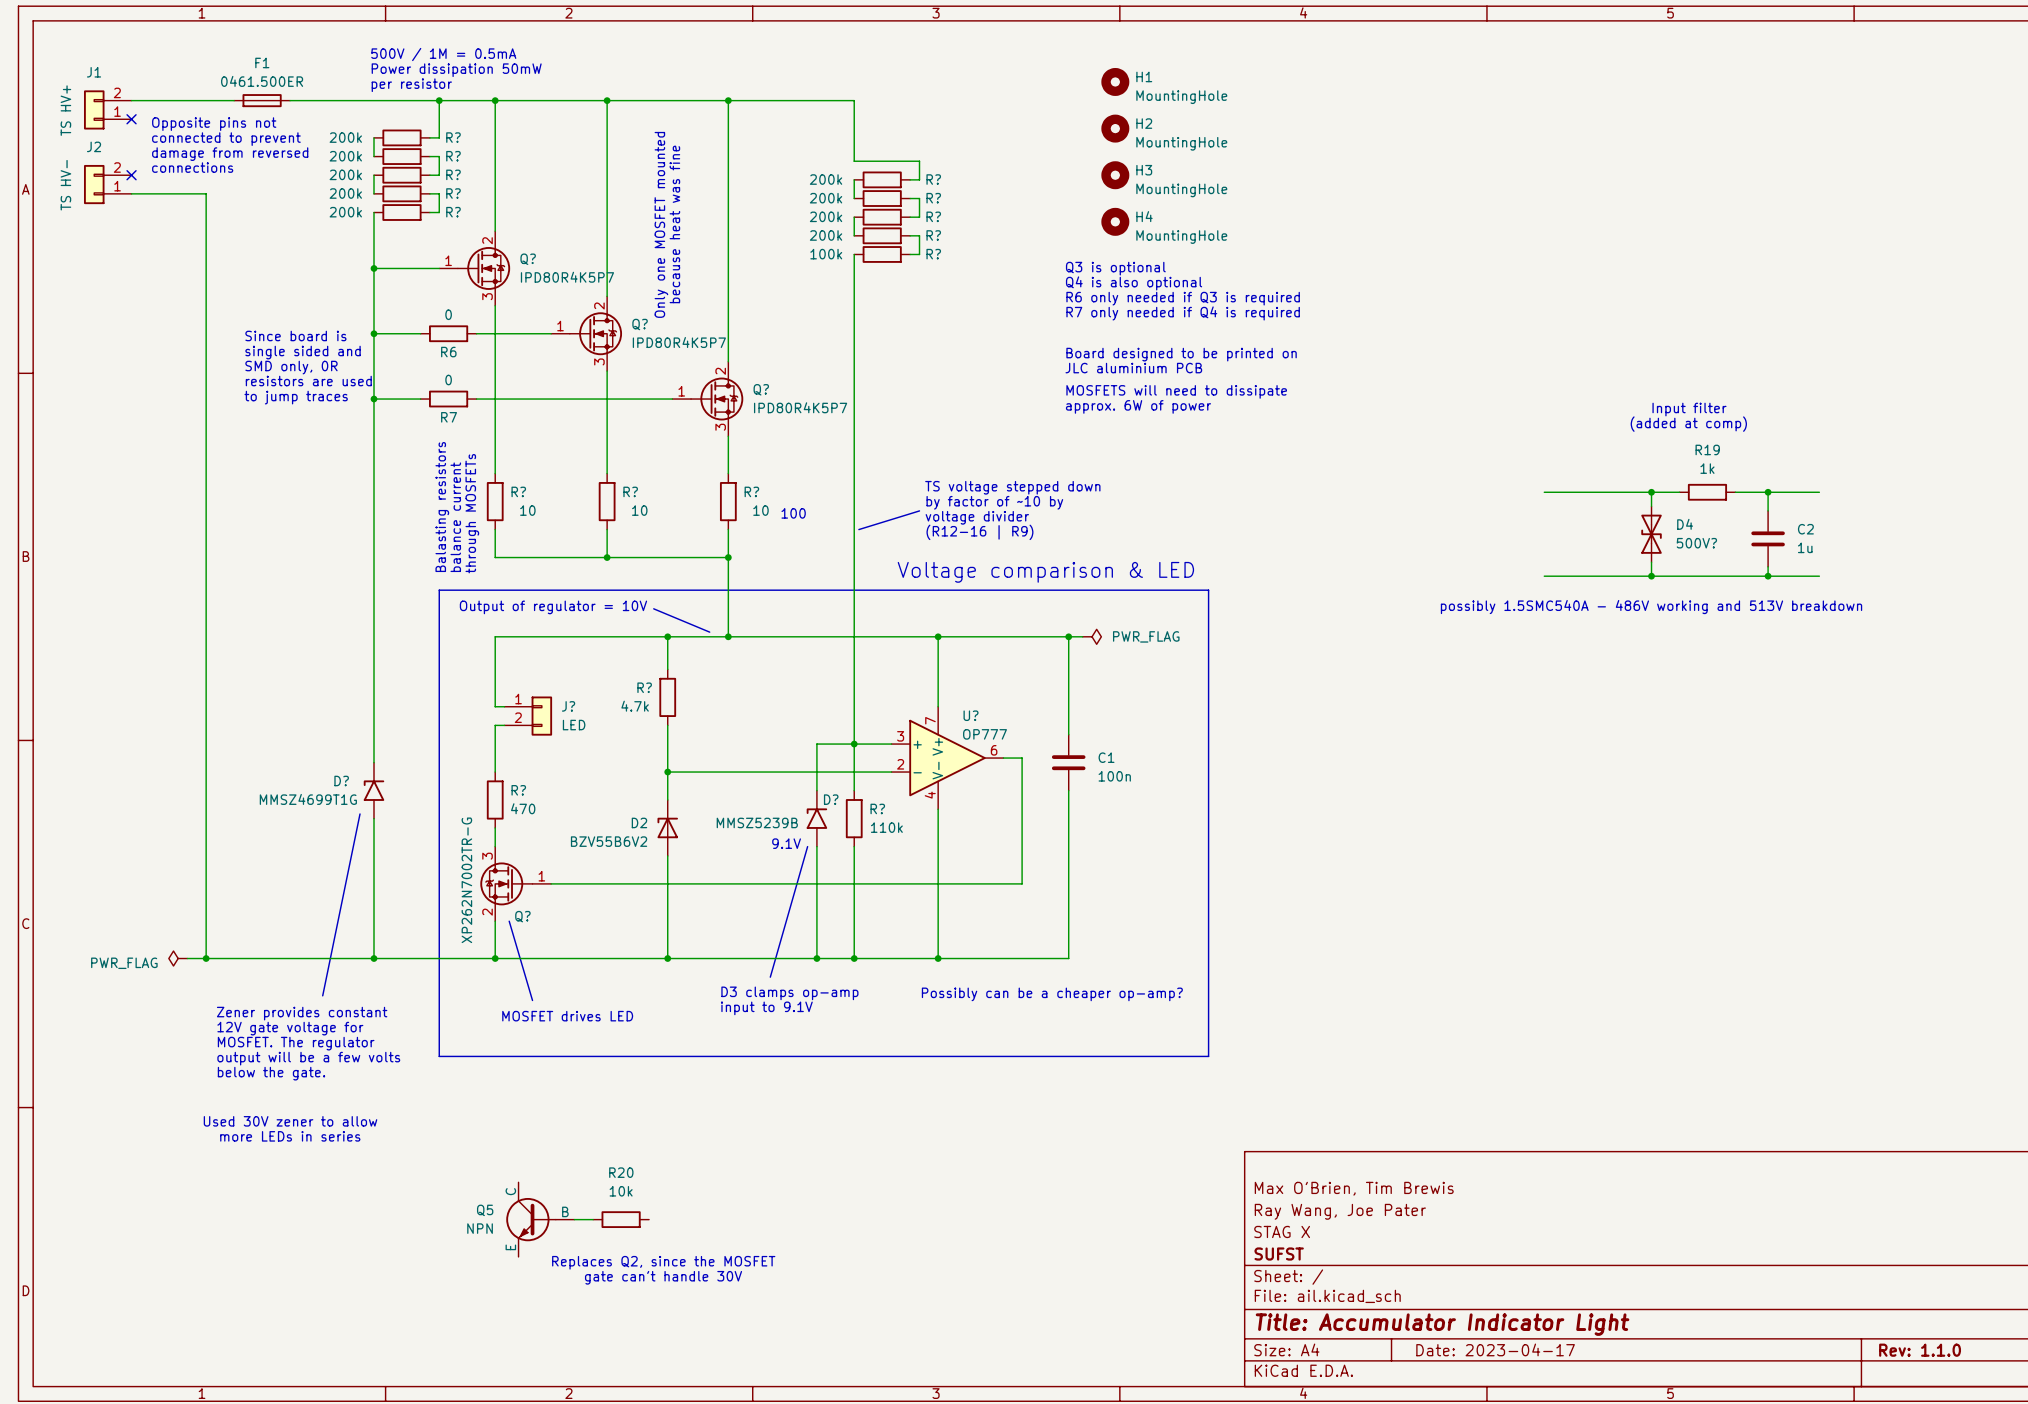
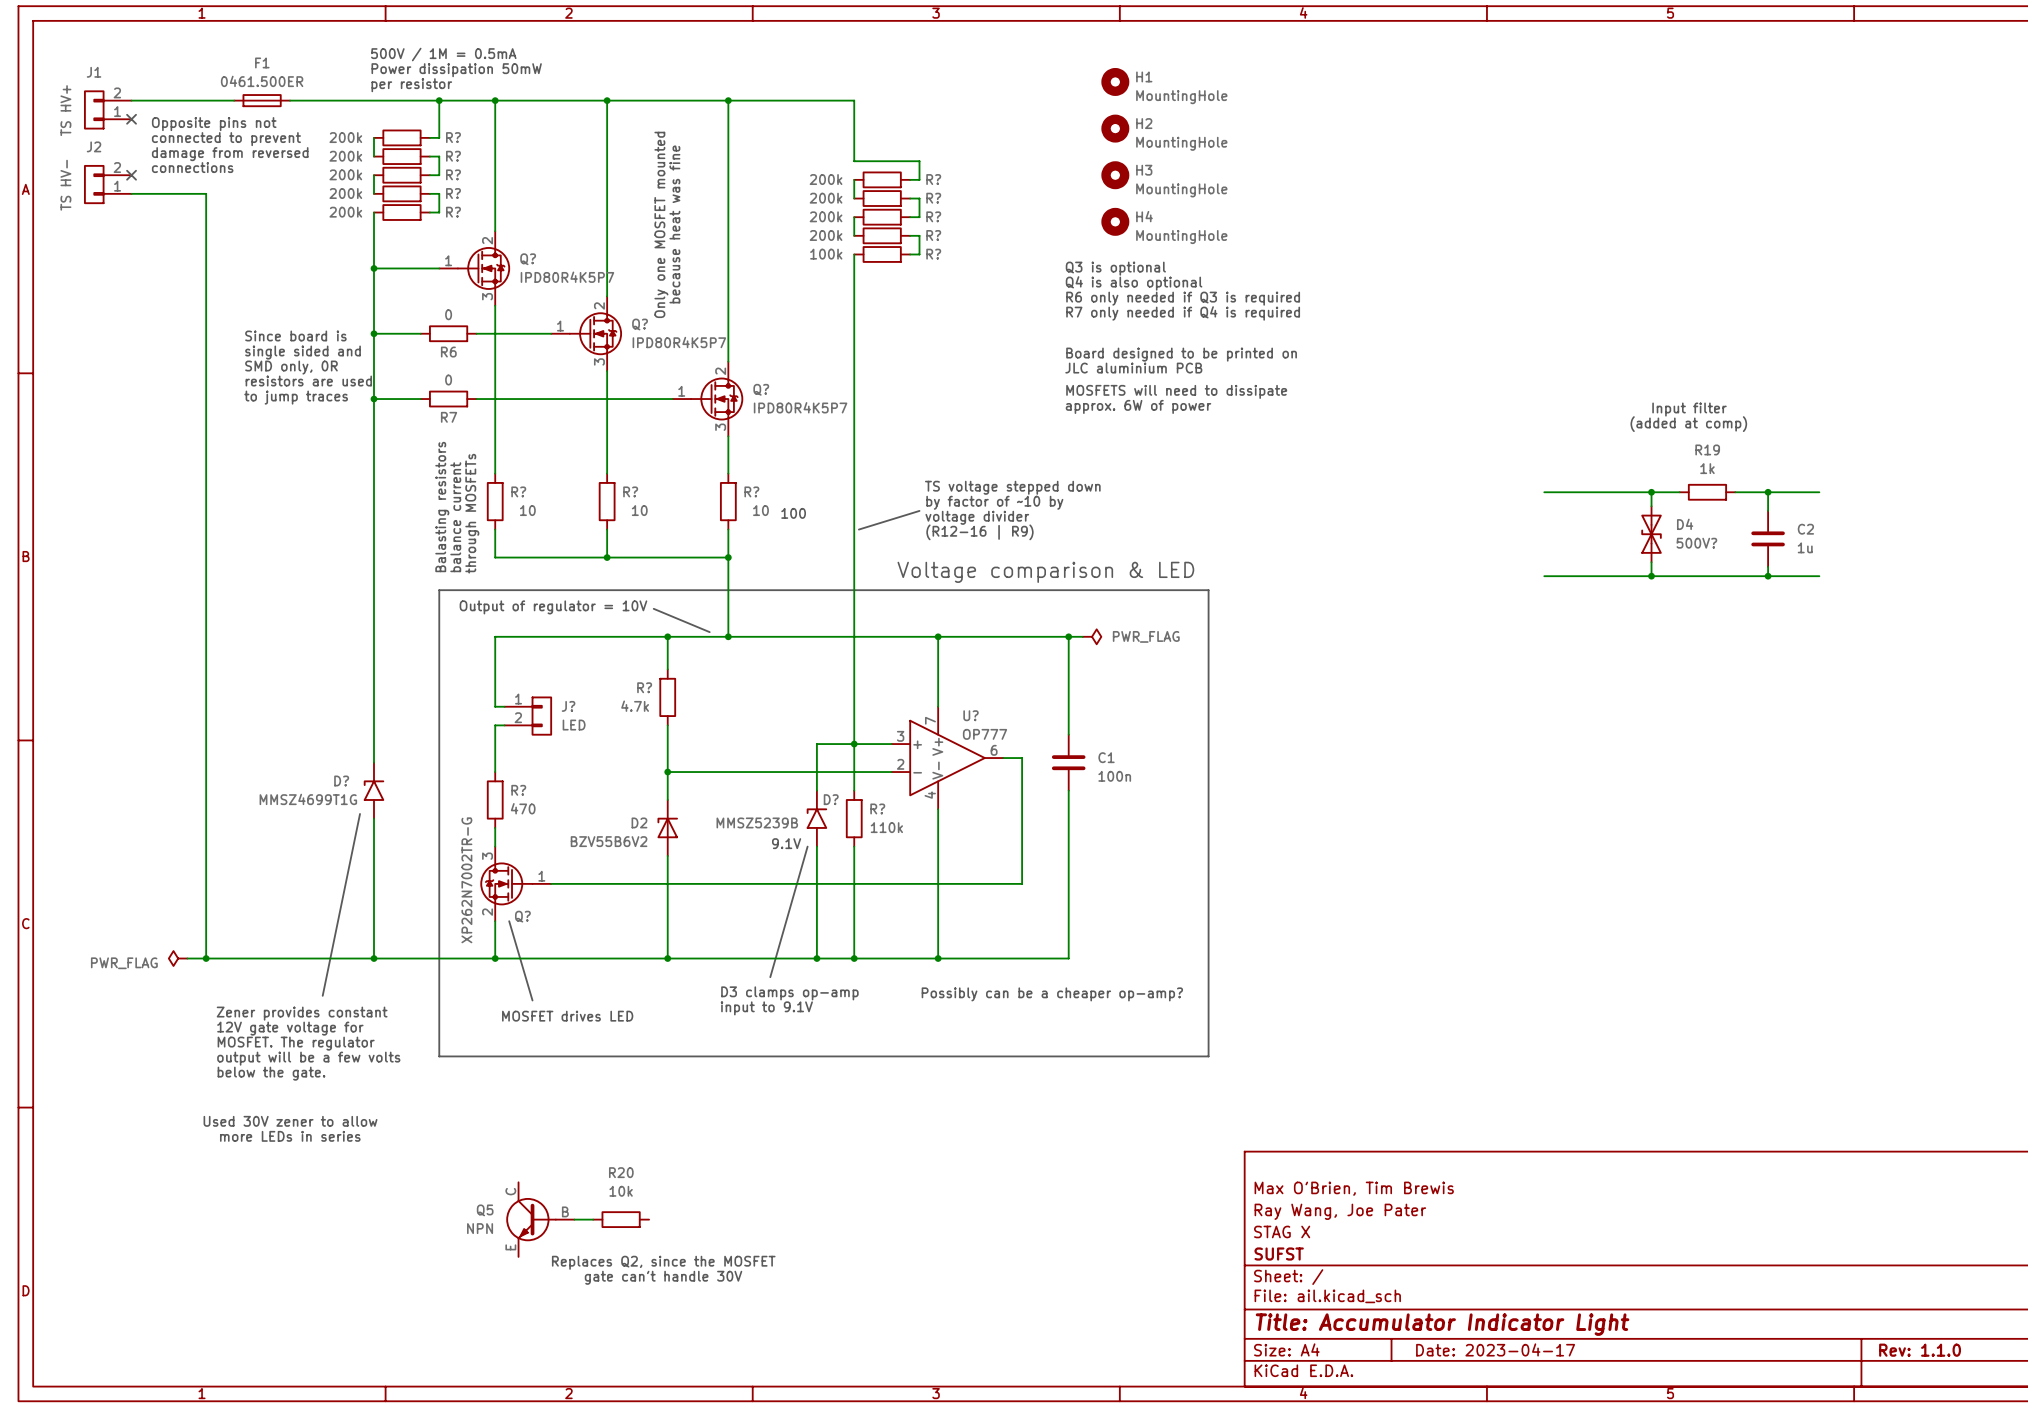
text: possibly 1.5SMC540A - 486V working and 513V breakdown (1651, 607) -> none

